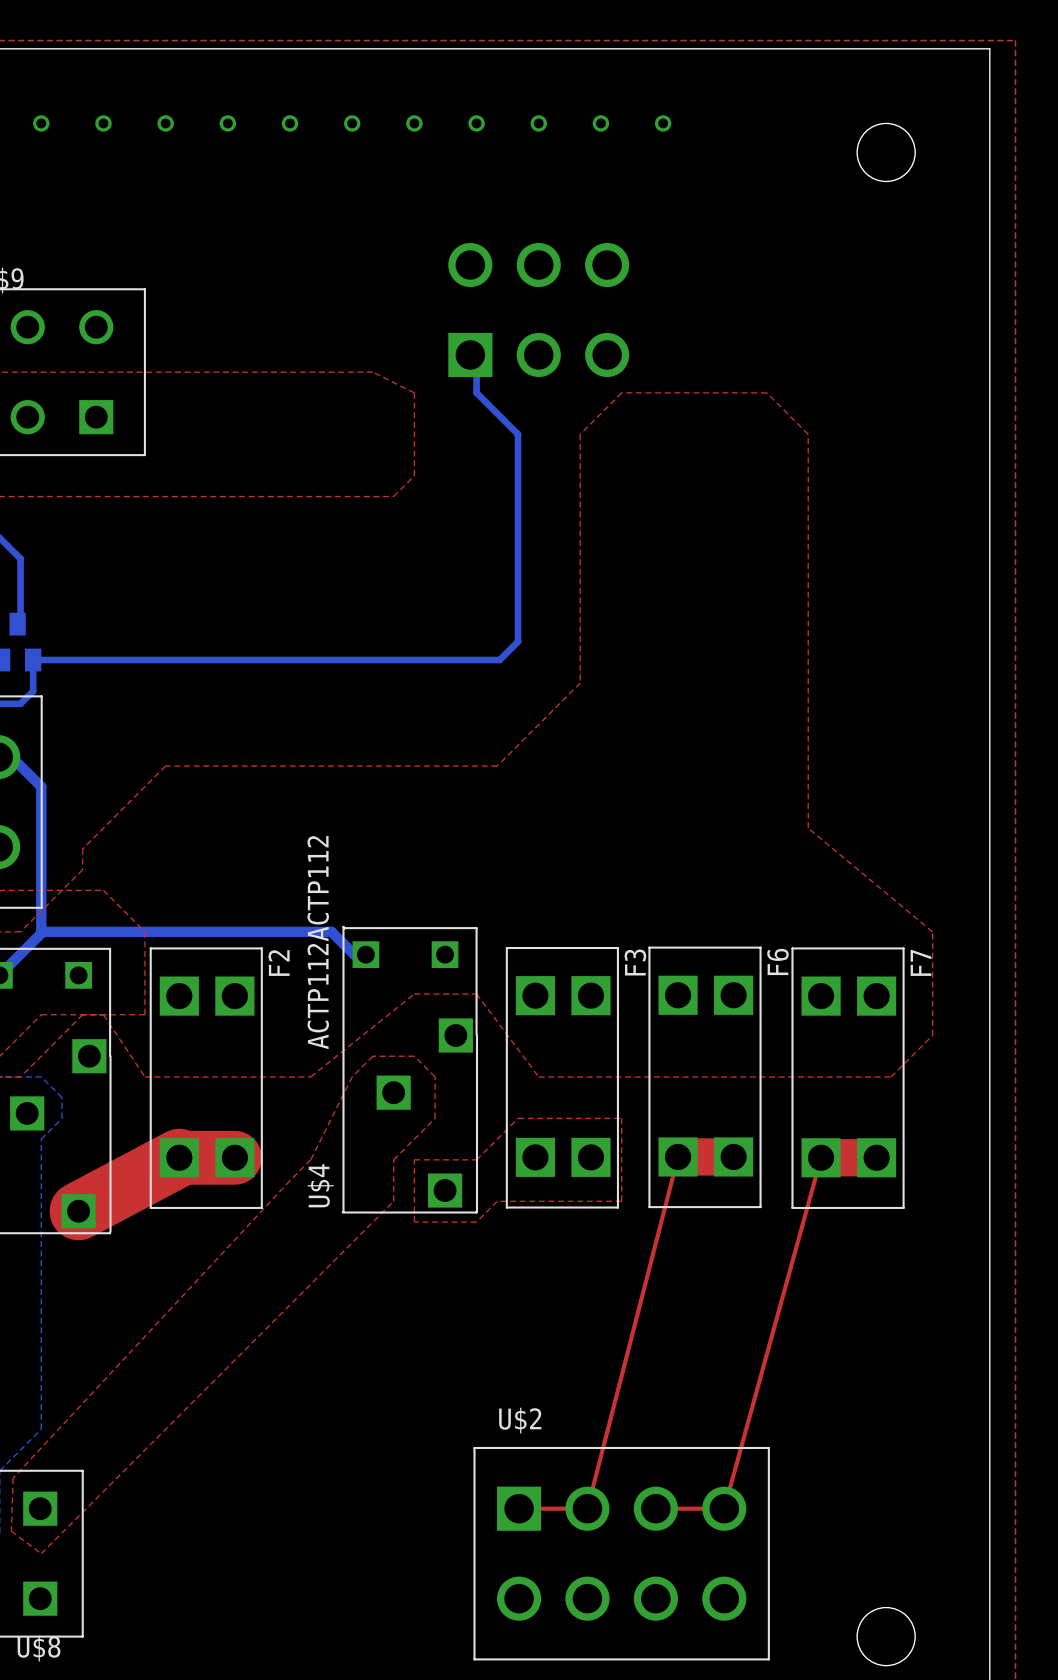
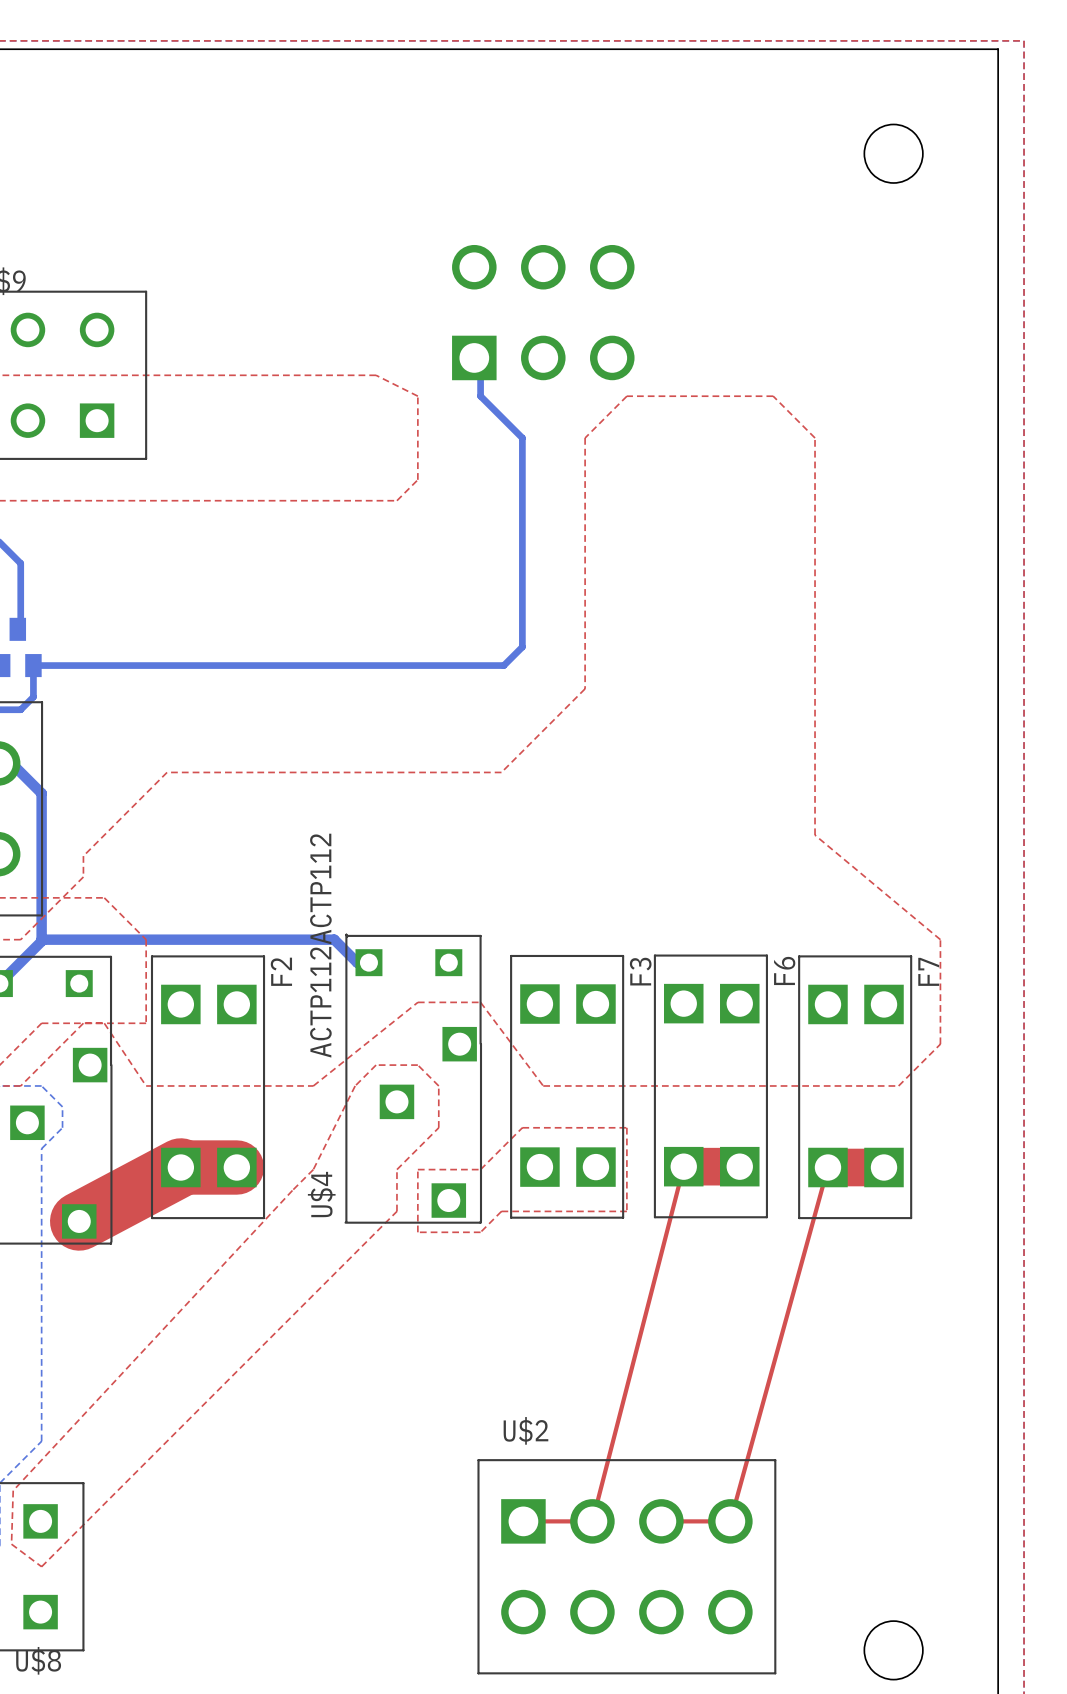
via: (41, 123) -> none
via: (103, 123) -> none
via: (165, 123) -> none
via: (227, 123) -> none
via: (290, 123) -> none
via: (352, 123) -> none
via: (414, 123) -> none
via: (476, 123) -> none
via: (538, 123) -> none
via: (600, 123) -> none
via: (663, 123) -> none

